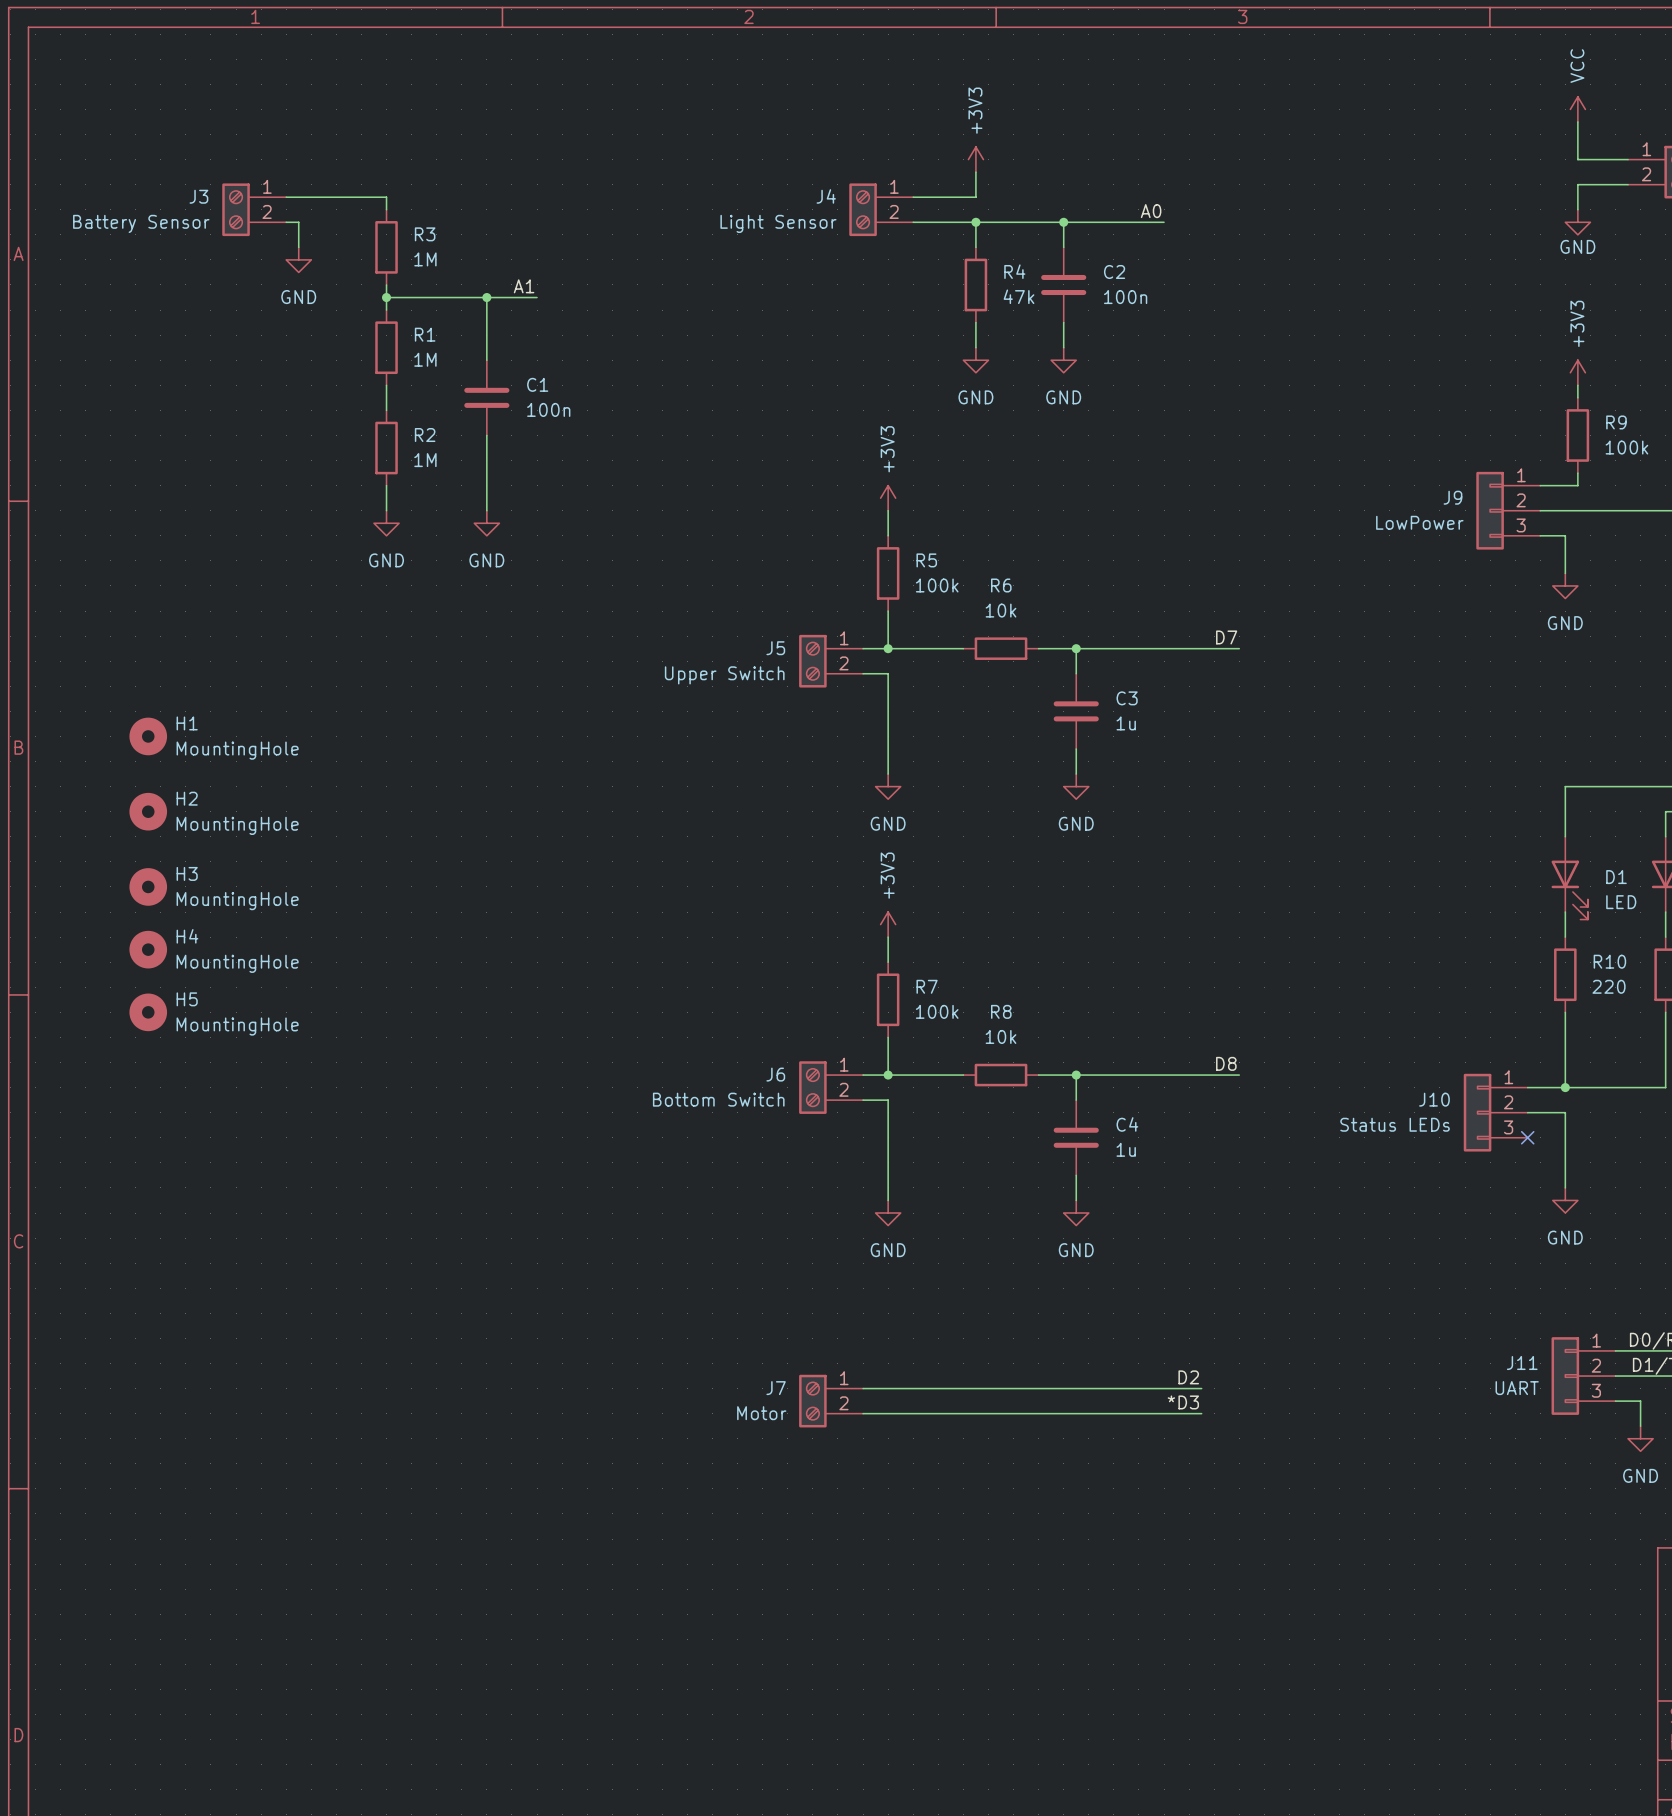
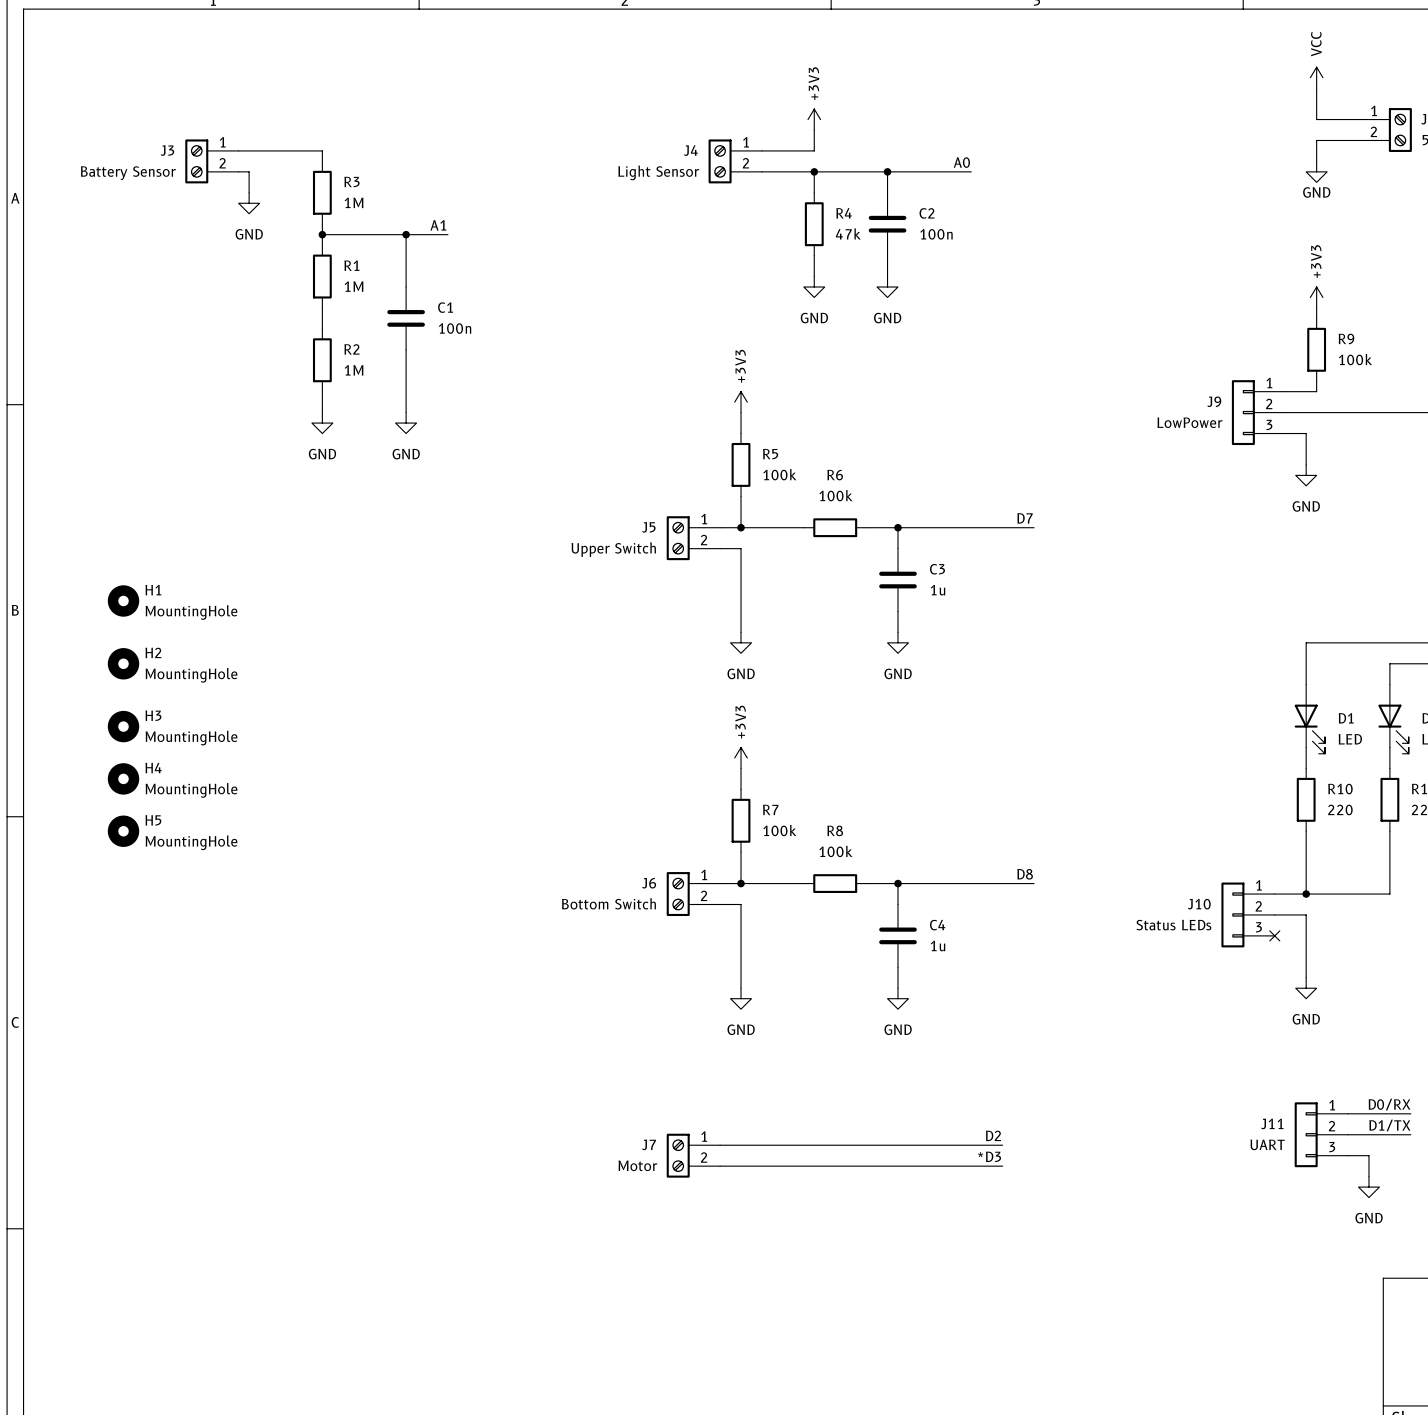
R6 value: 10k (1001, 610) -> 100k (835, 495)
R8 value: 10k (1001, 1036) -> 100k (835, 851)

